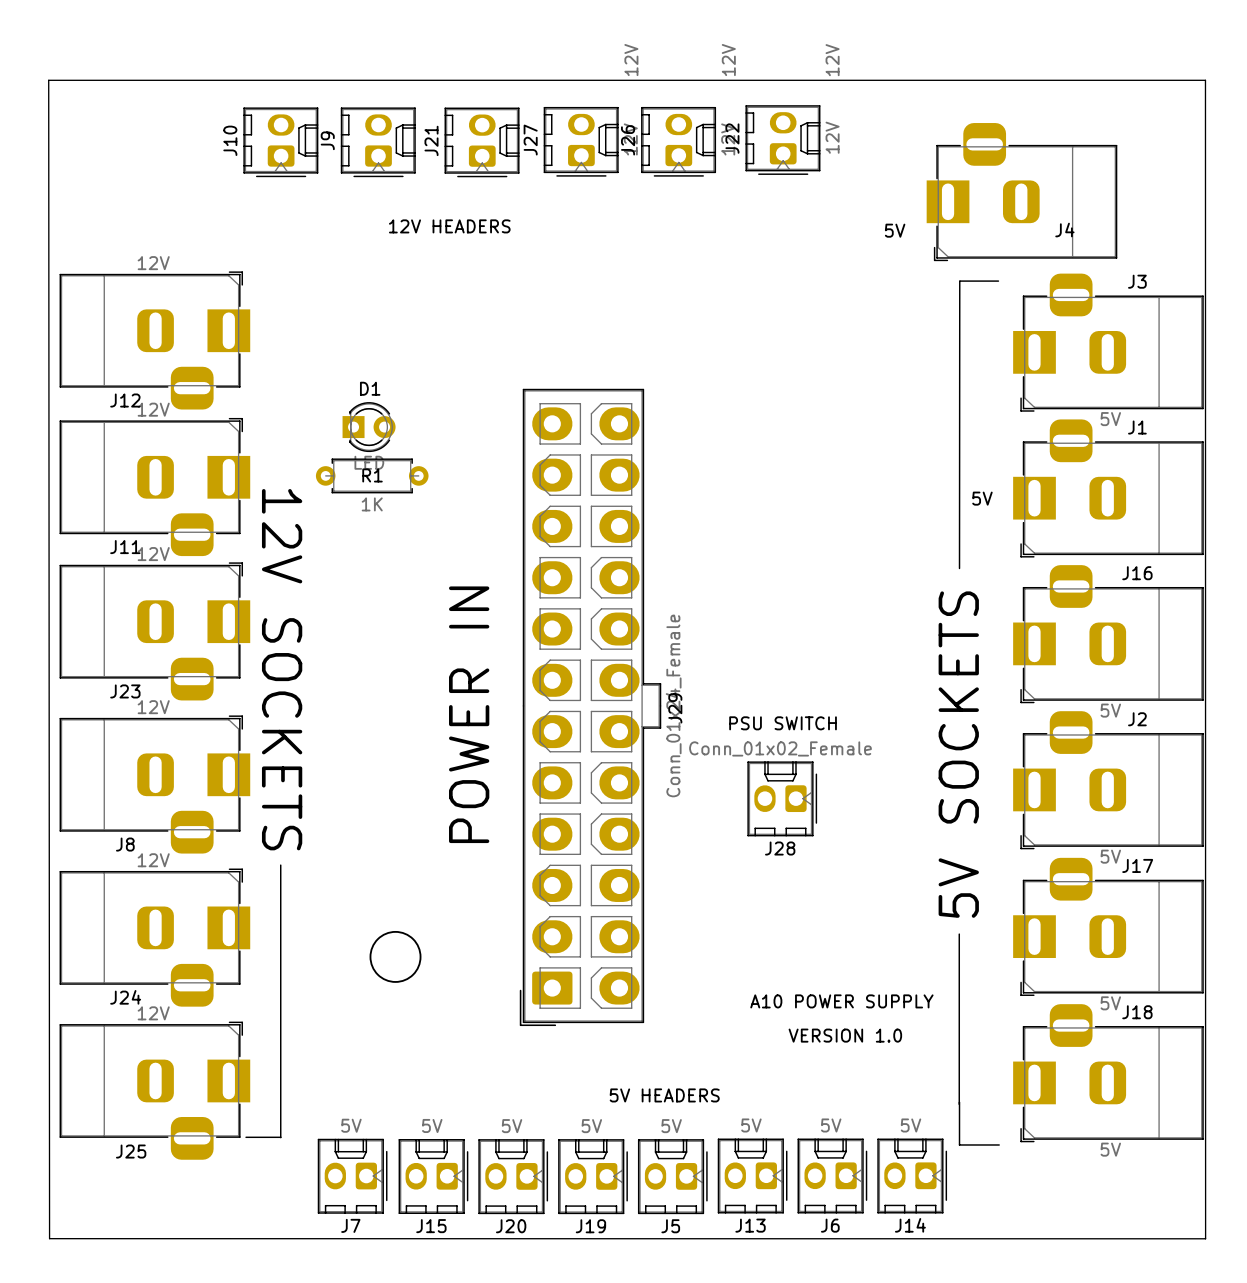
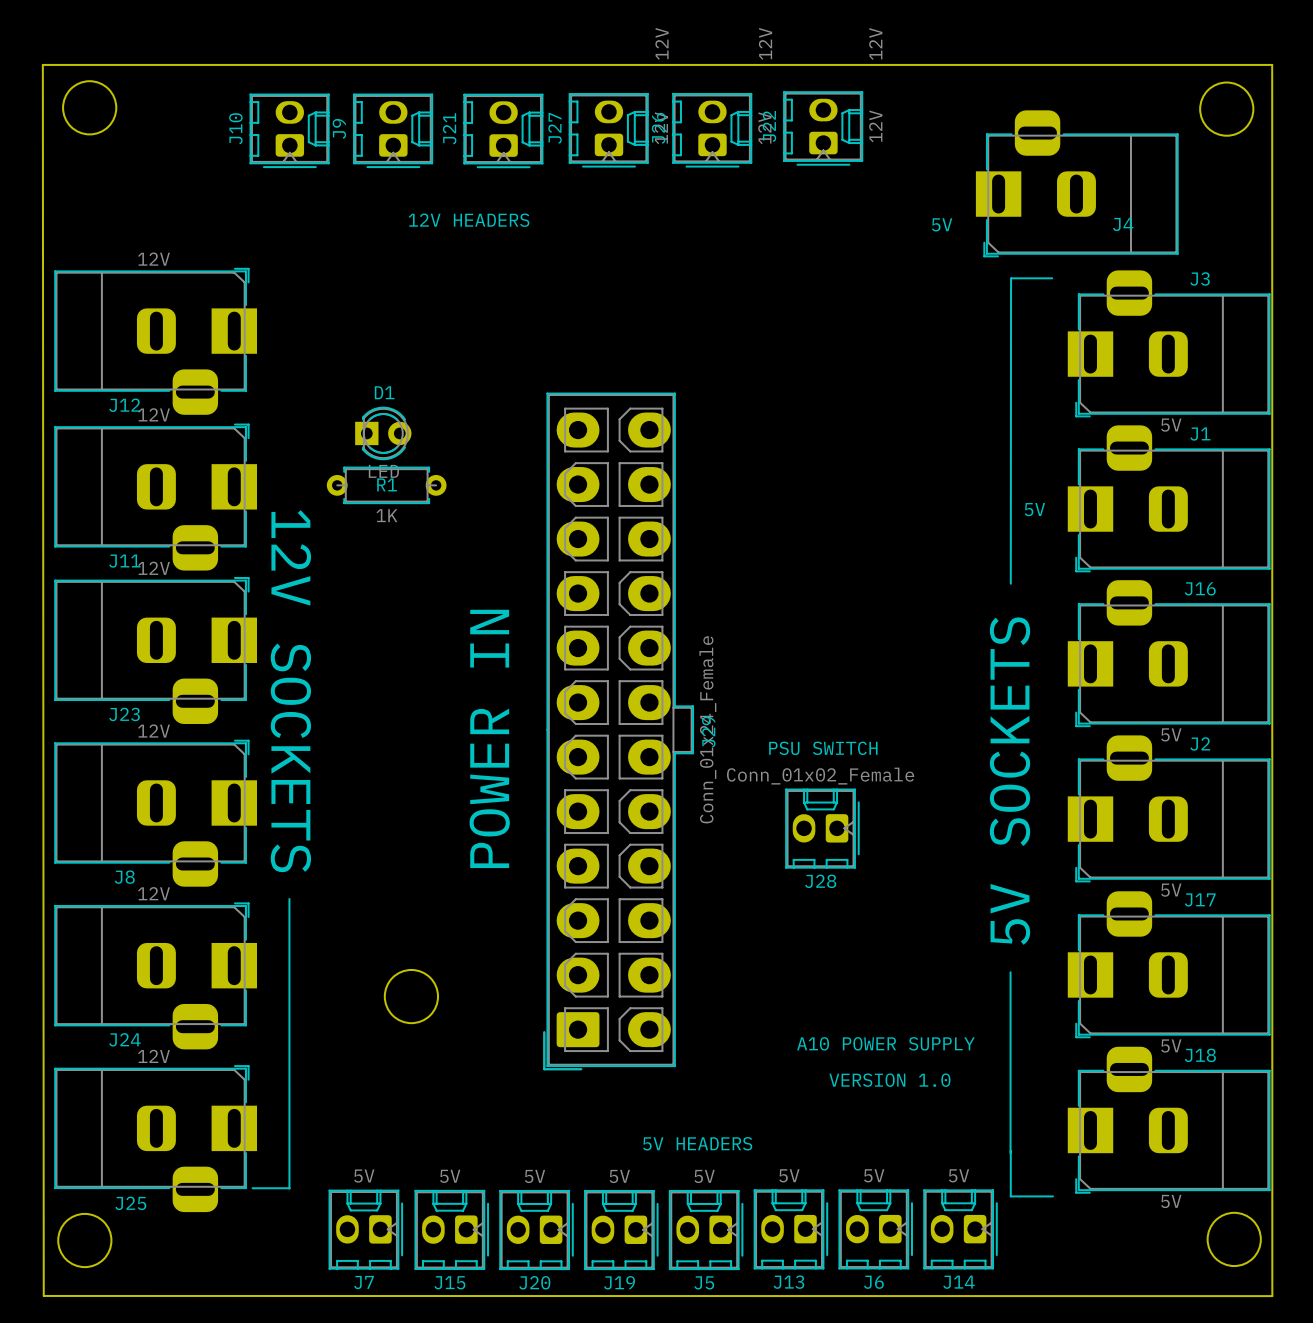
round board edge: none -> [62, 80, 118, 136]
round board edge: none -> [1199, 81, 1255, 137]
round board edge: none -> [1206, 1211, 1262, 1268]
round board edge: none -> [57, 1212, 113, 1269]

